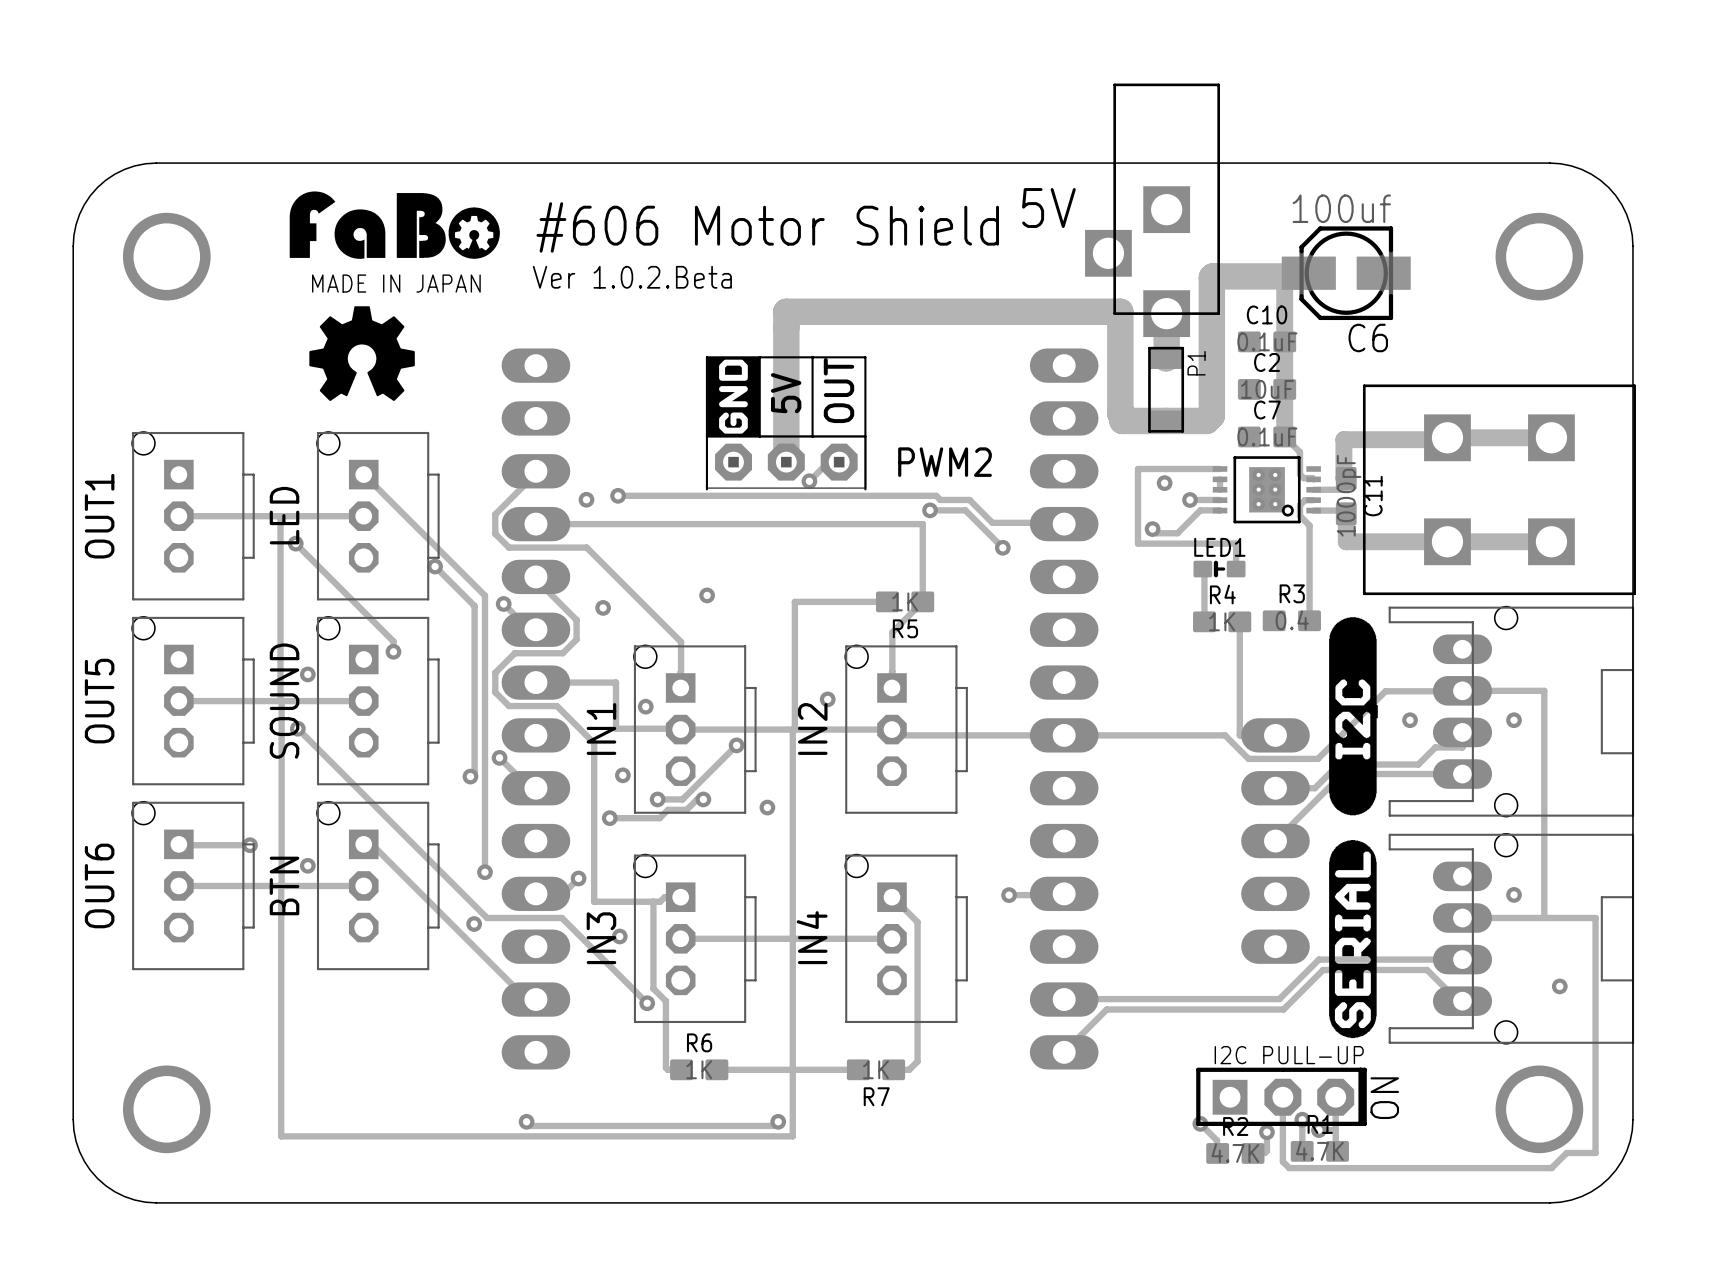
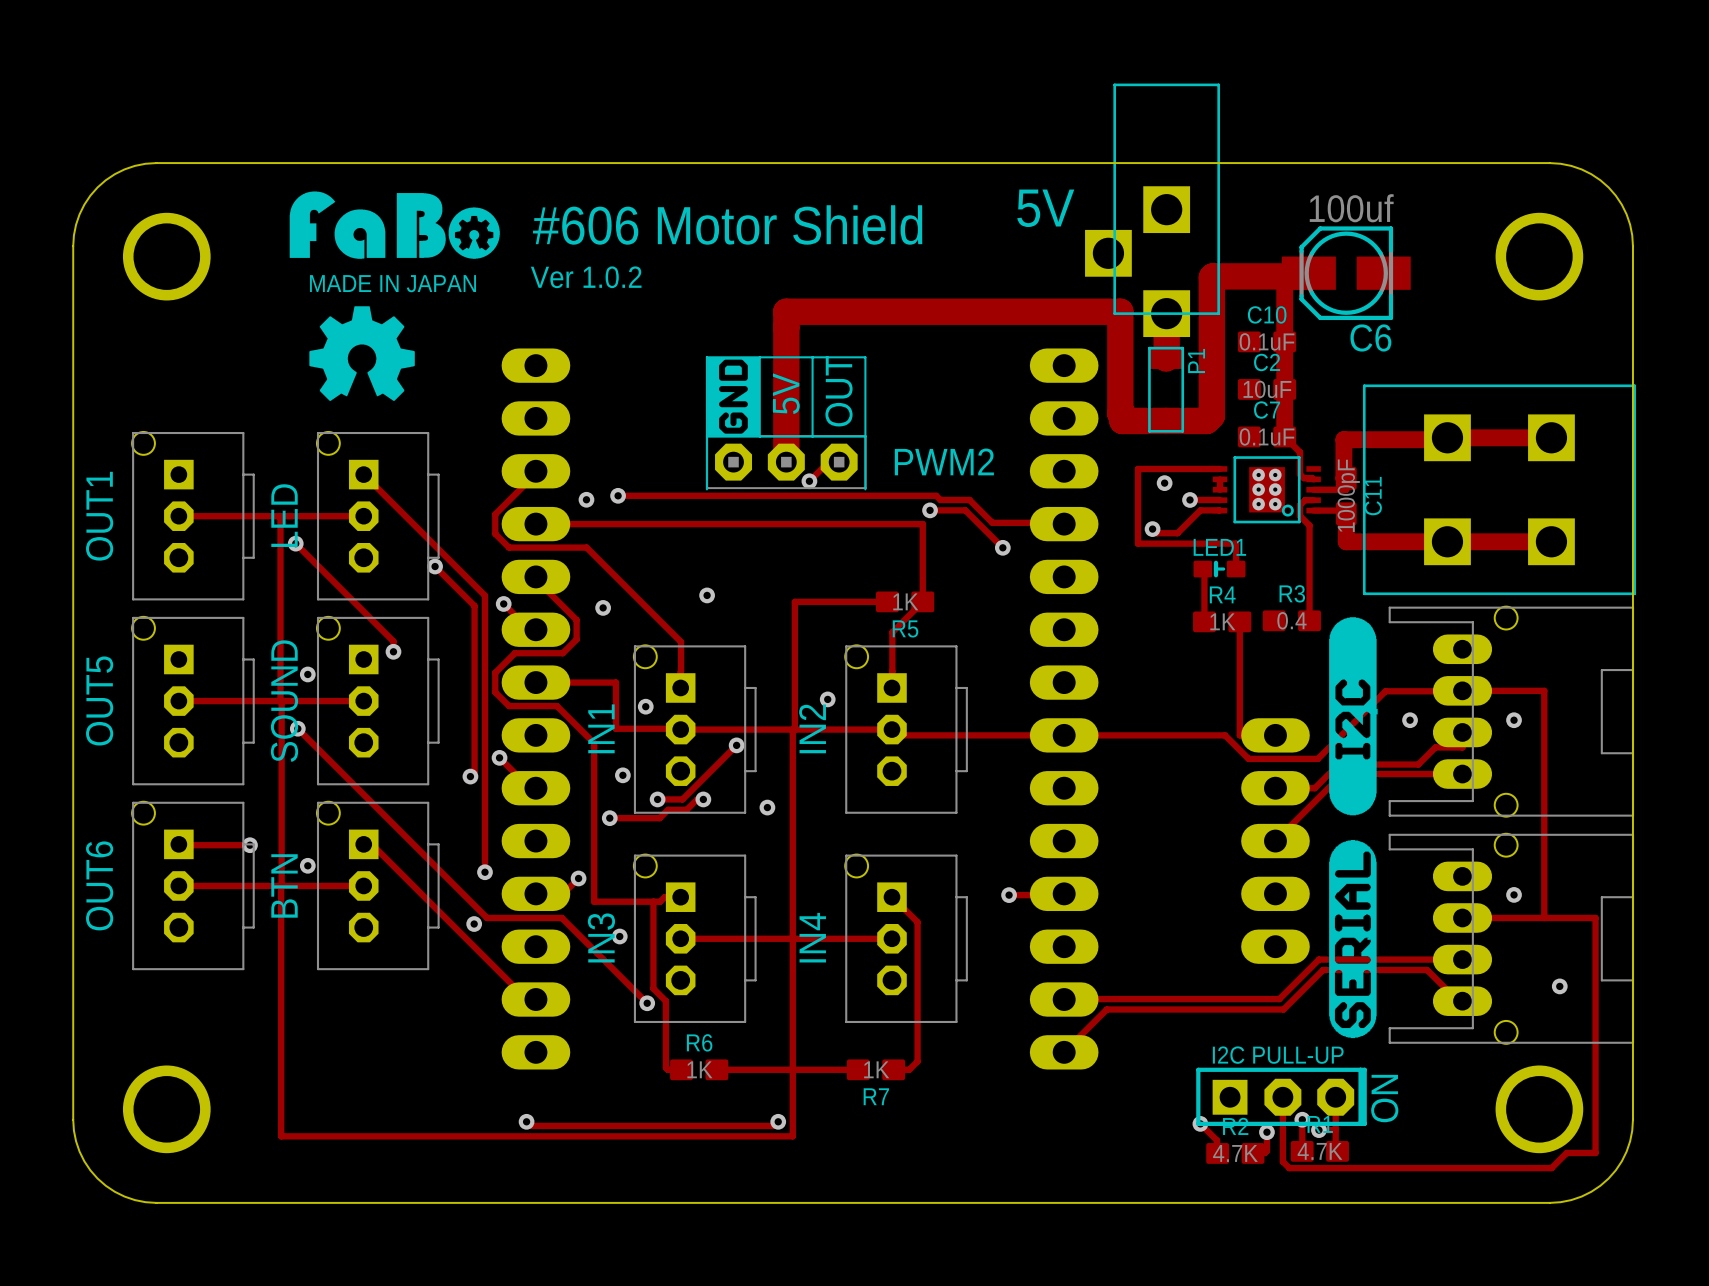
text: Ver 1.0.2.Beta (632, 277) -> Ver 1.0.2 (586, 277)

